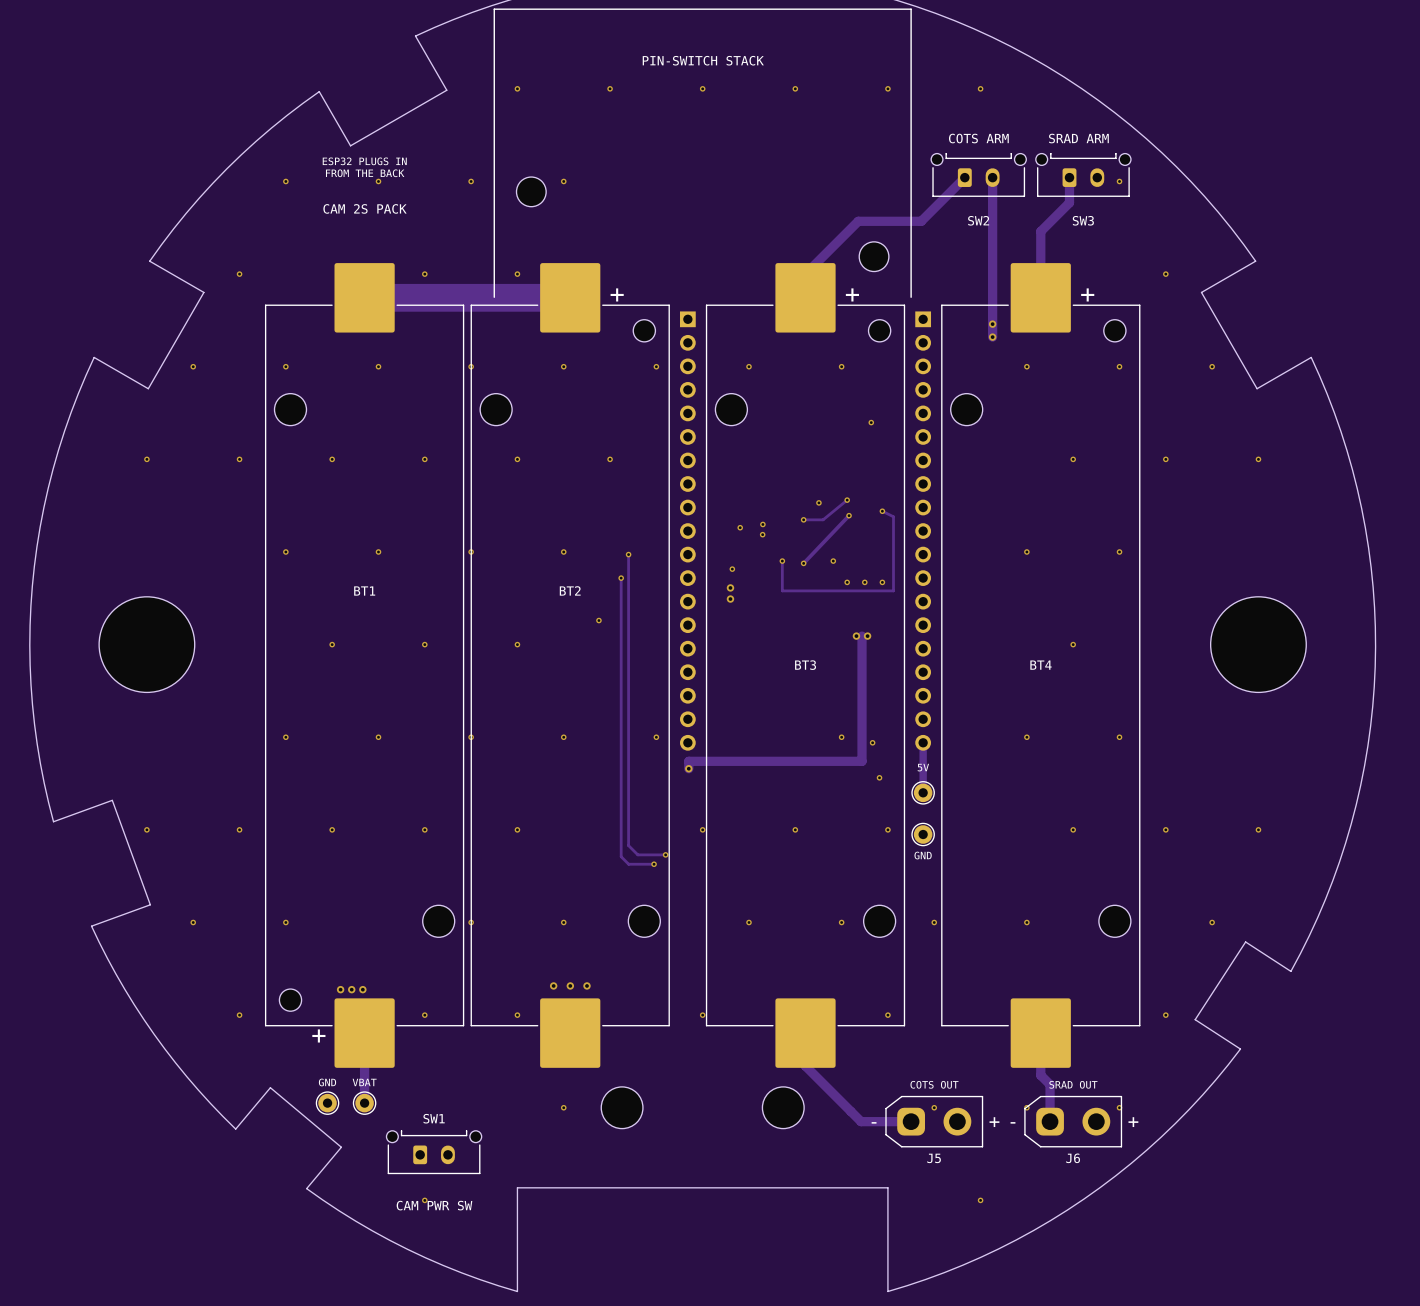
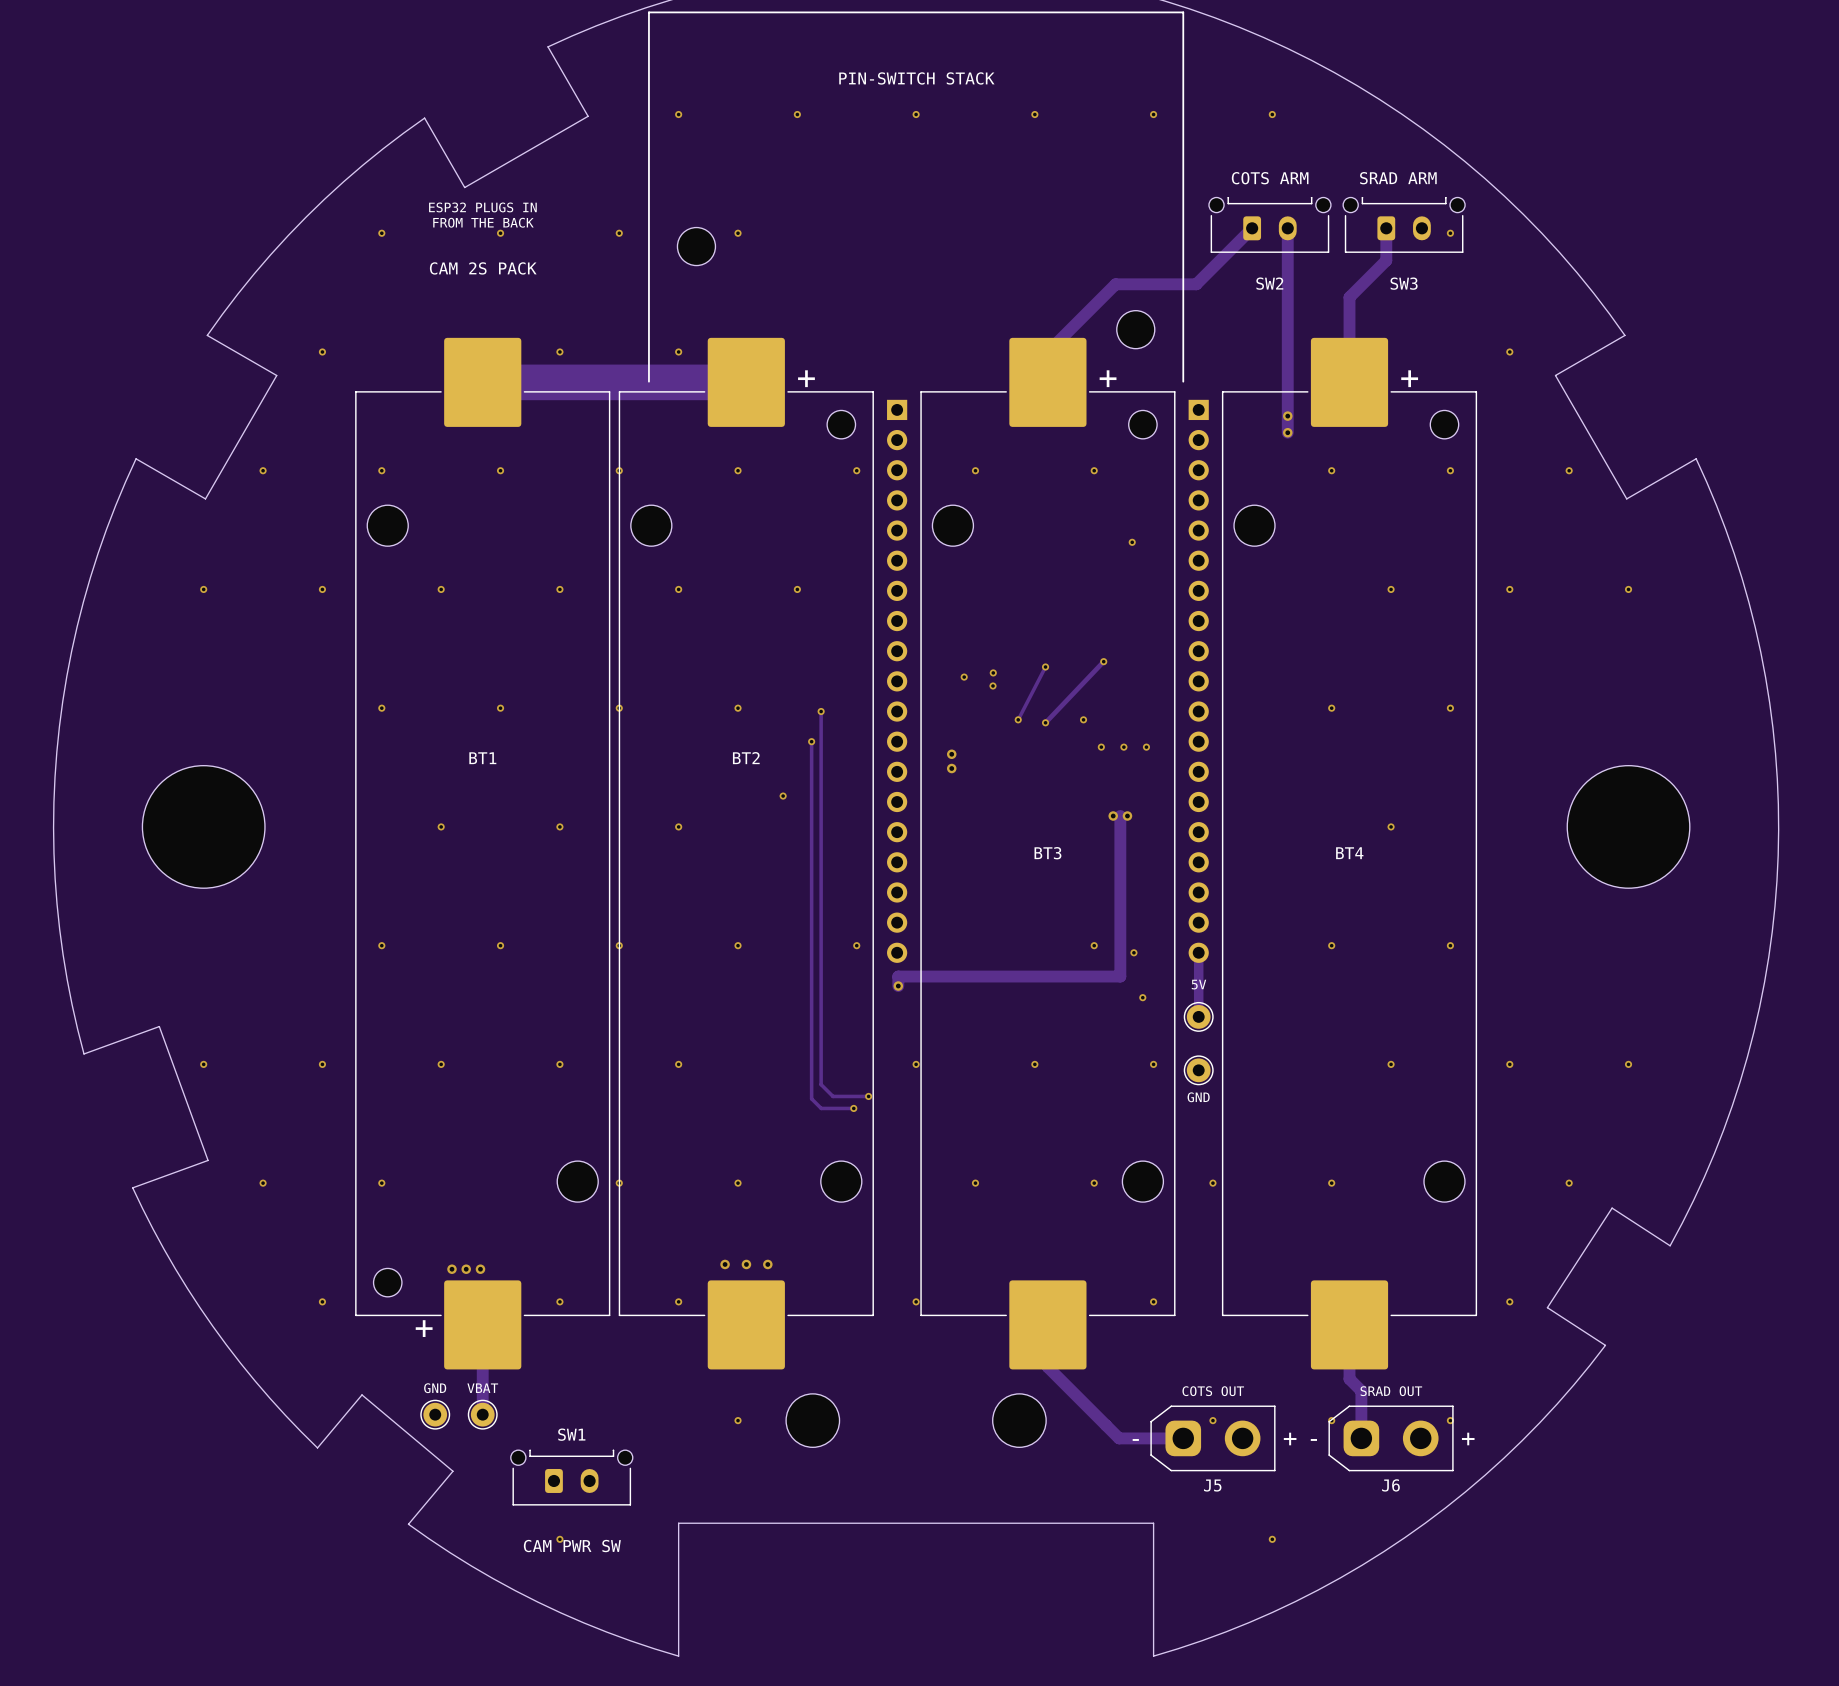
track: (847, 500) (823, 519) (803, 519) -> none
via: (847, 500) -> none
via: (818, 502) -> none
track: (882, 511) (893, 516) (893, 590) (782, 590) (782, 561) -> (1045, 666) (1018, 719)
via: (882, 511) -> none
via: (732, 569) -> none

